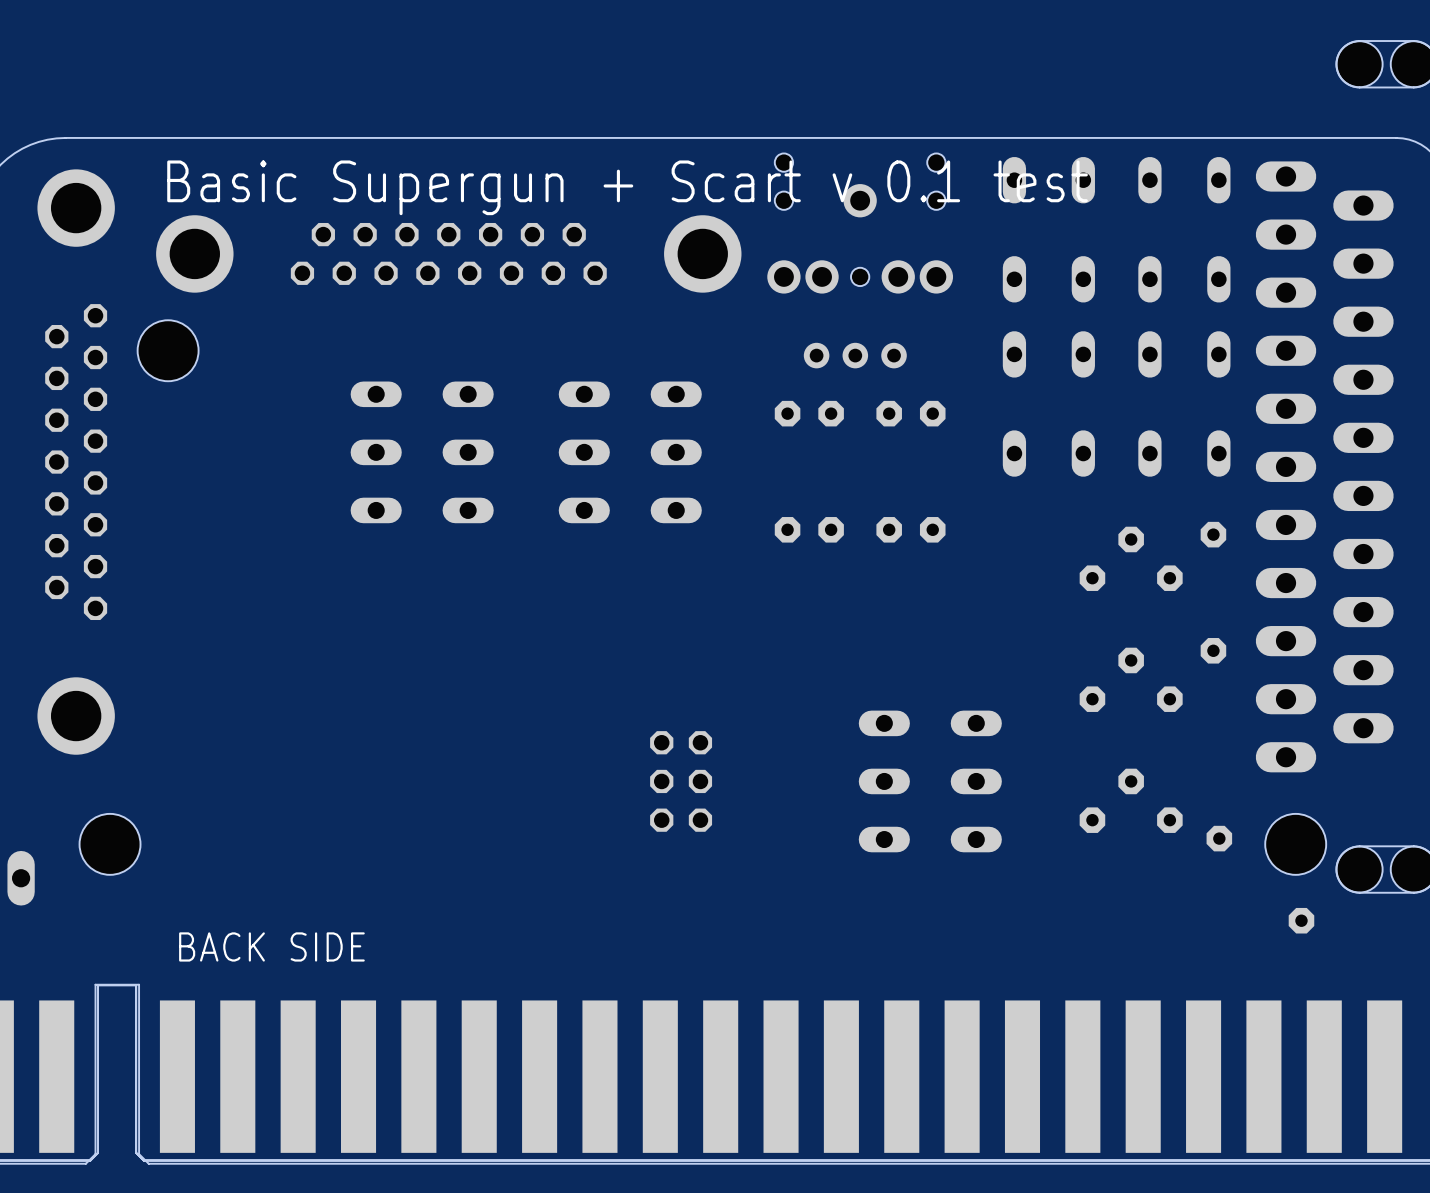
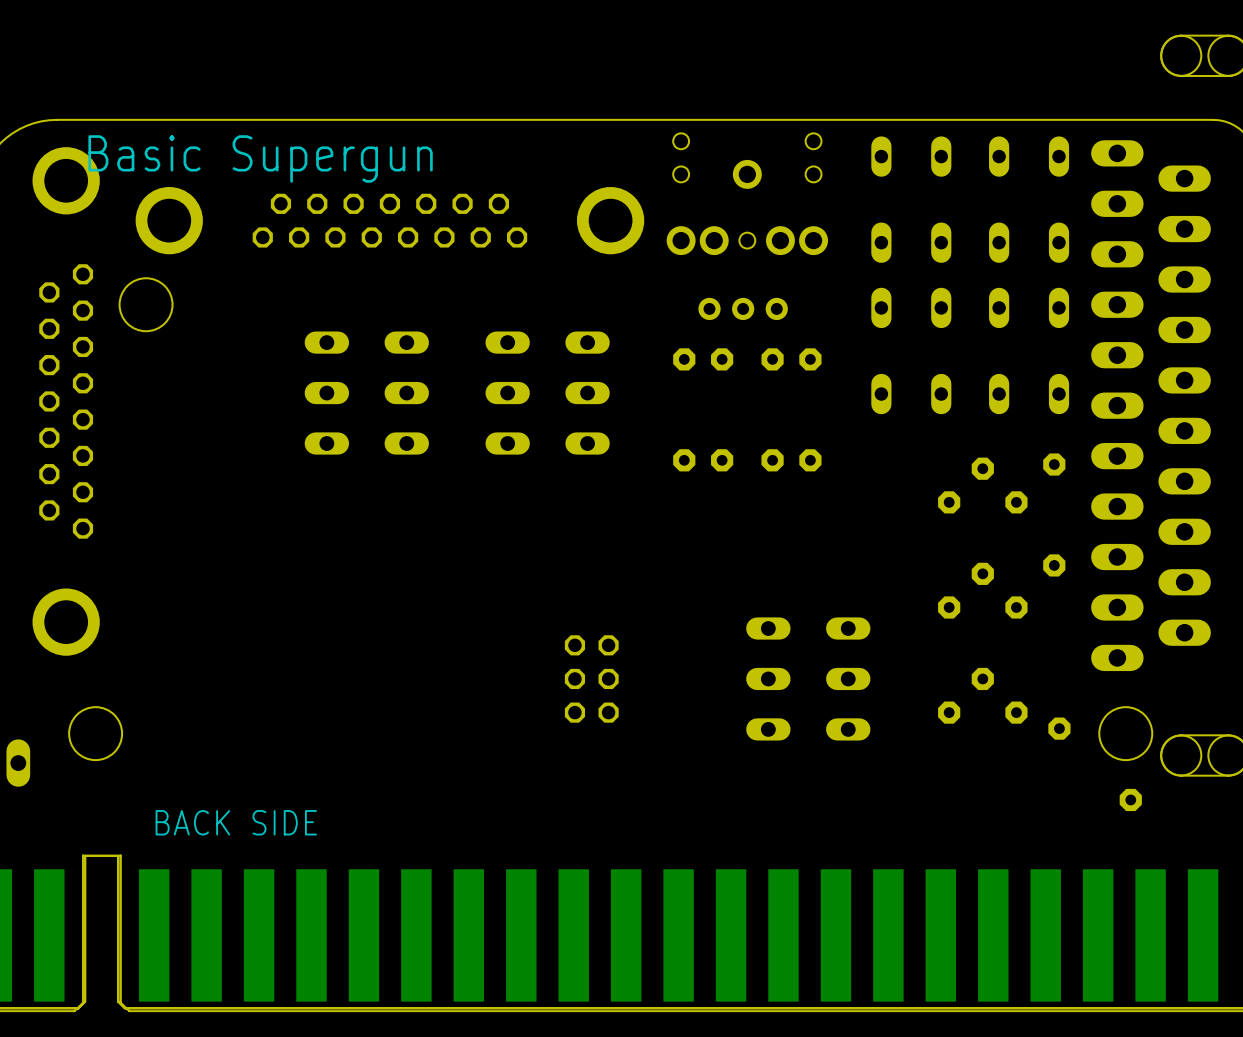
text: none -> Basic Supergun (260, 158)
text: Basic Supergun + Scart v 0.1 test (627, 187) -> none

